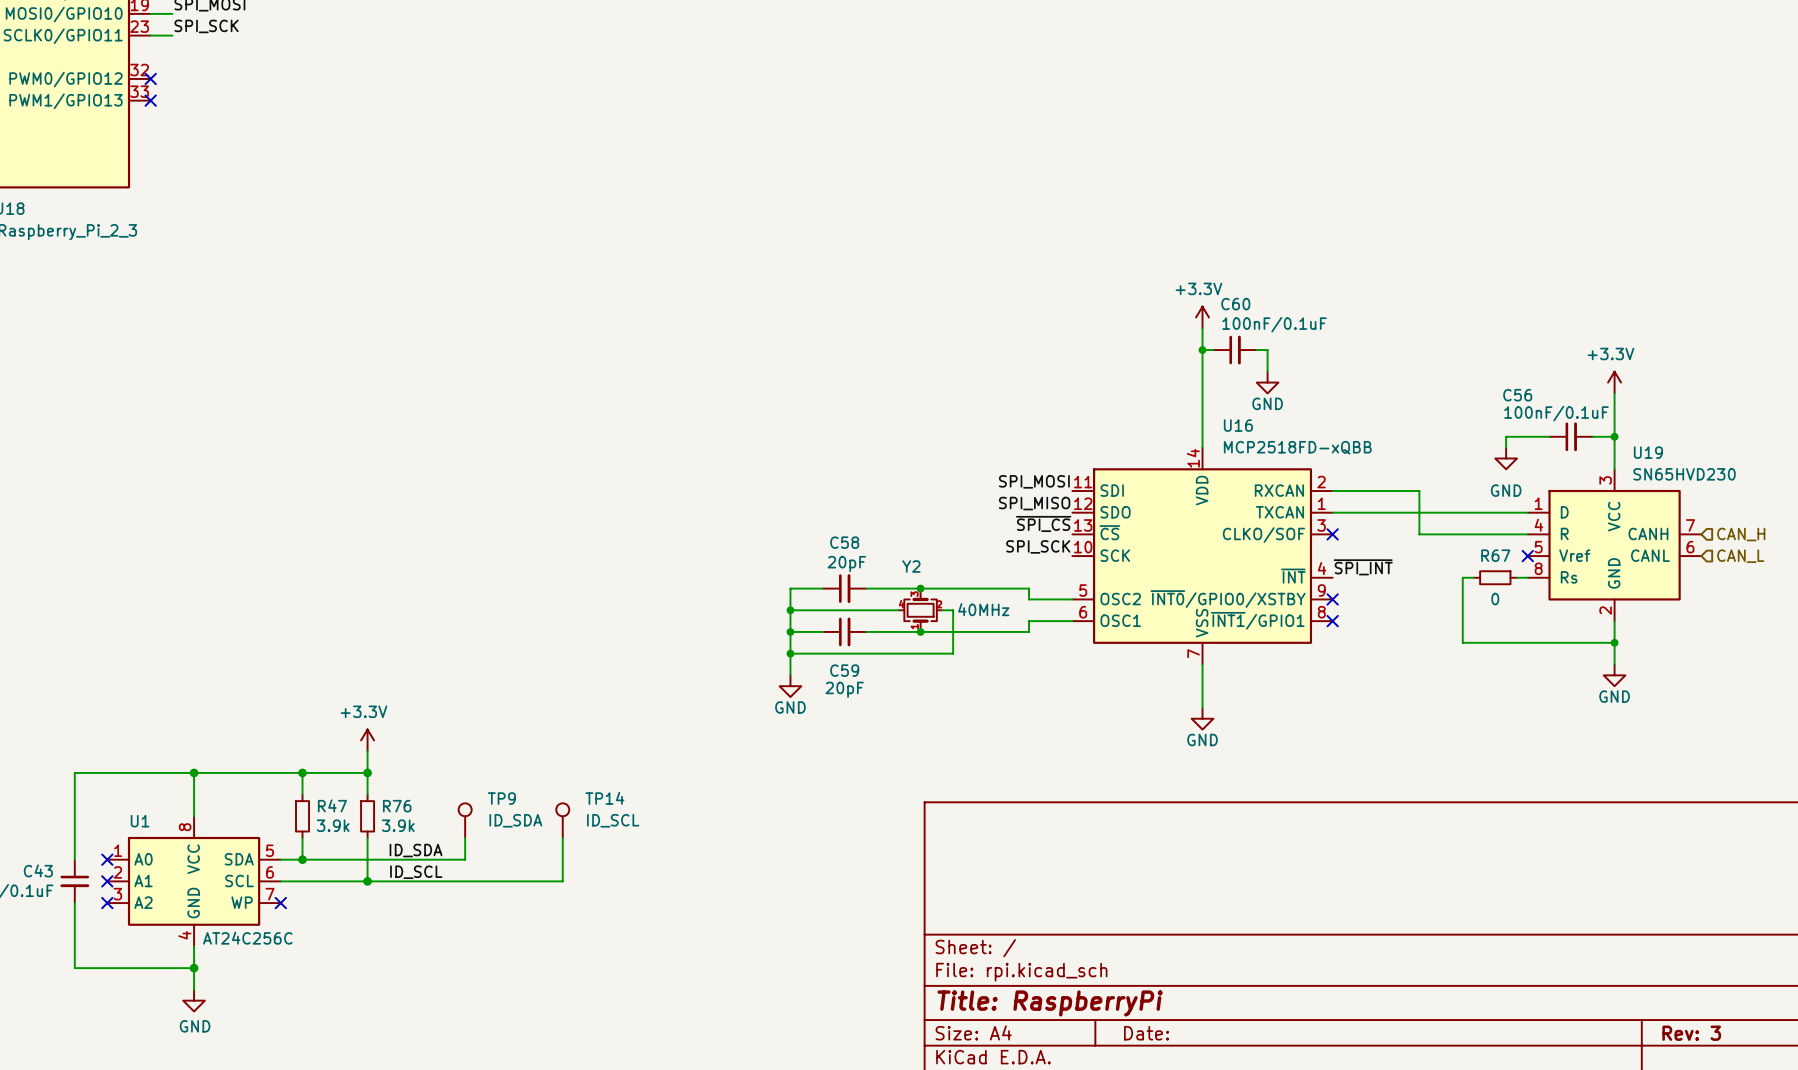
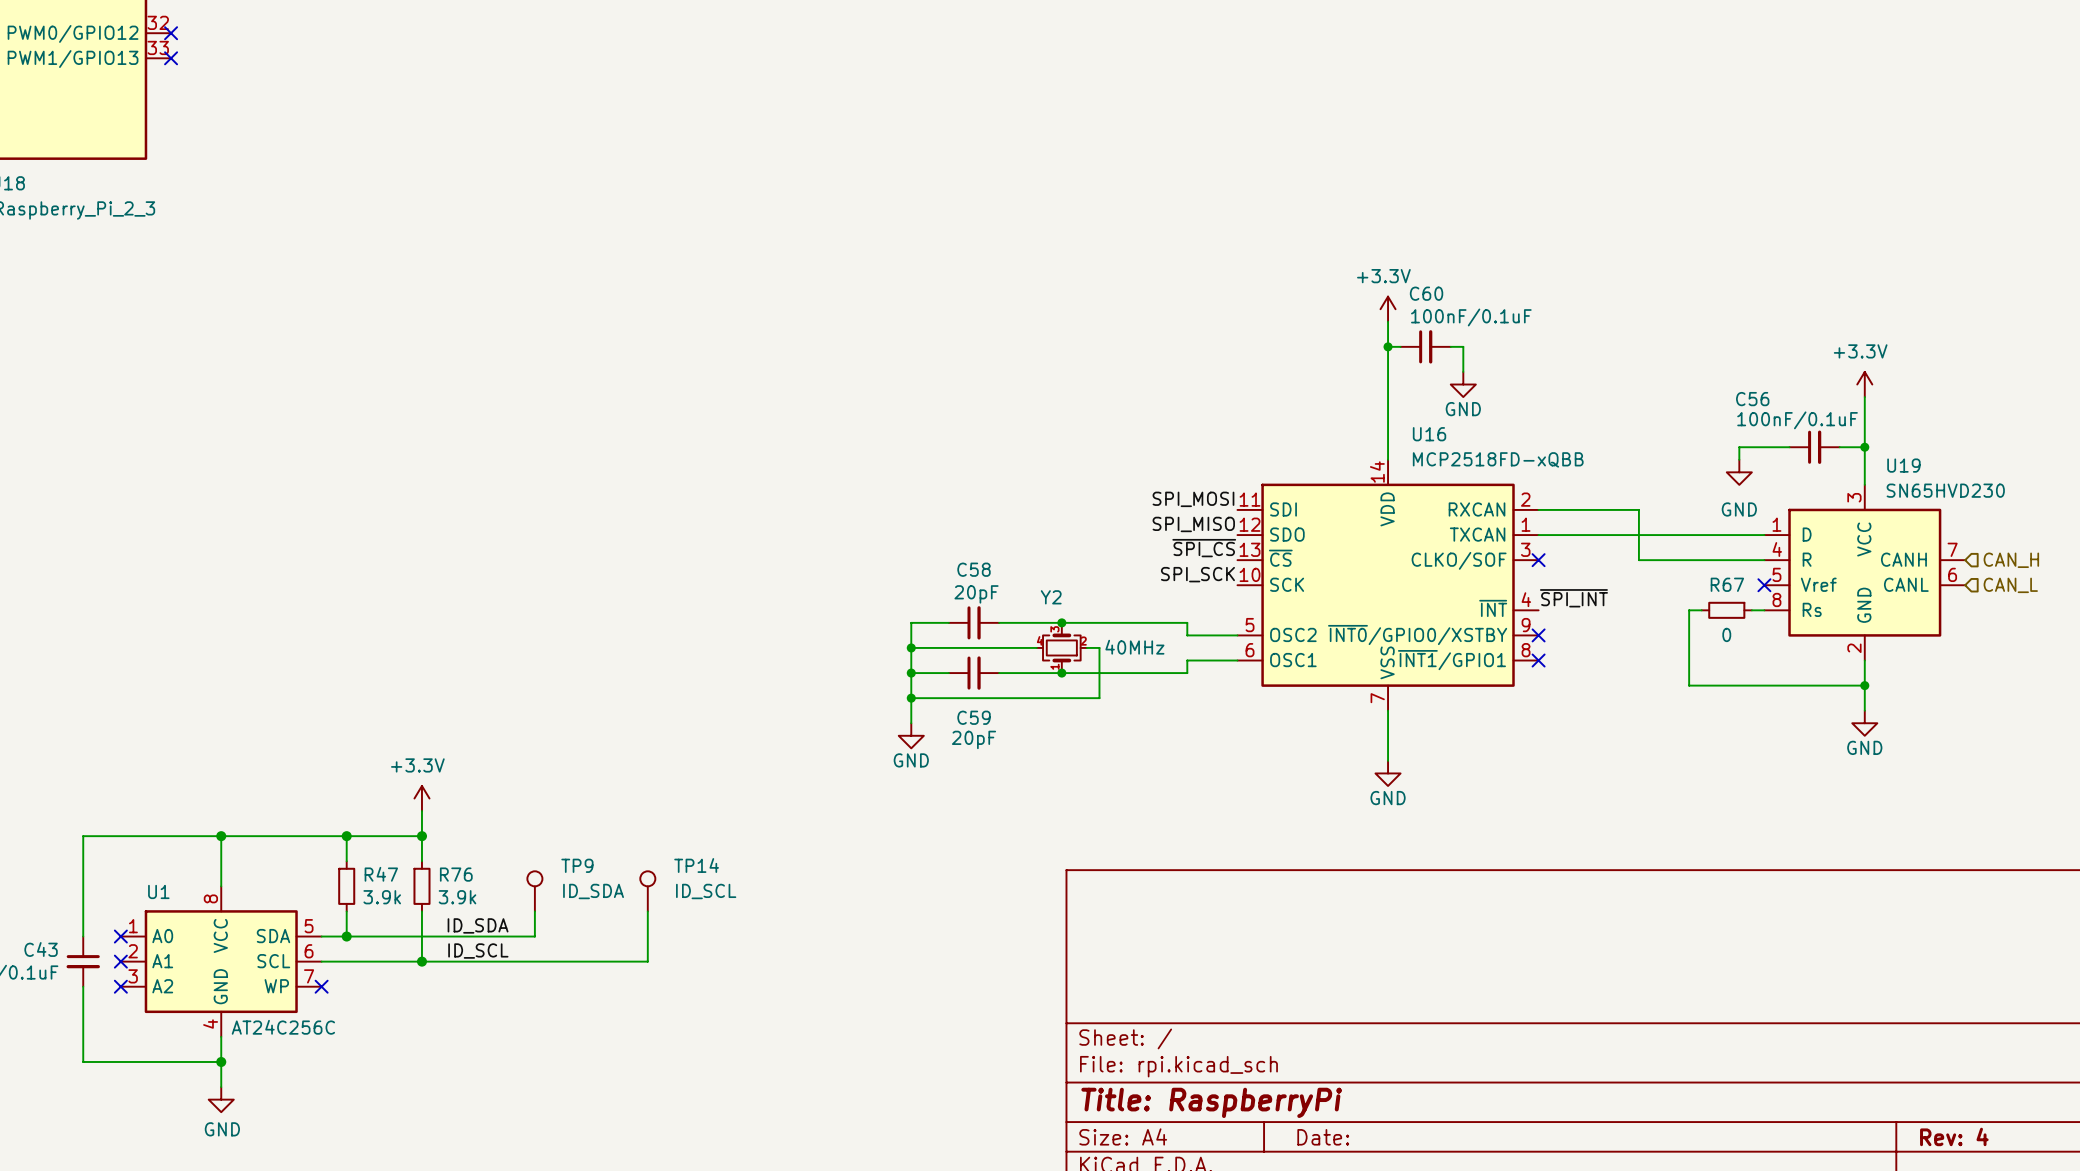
title block: Rev: 3 (1691, 1033) -> Rev: 4 (1954, 1136)

